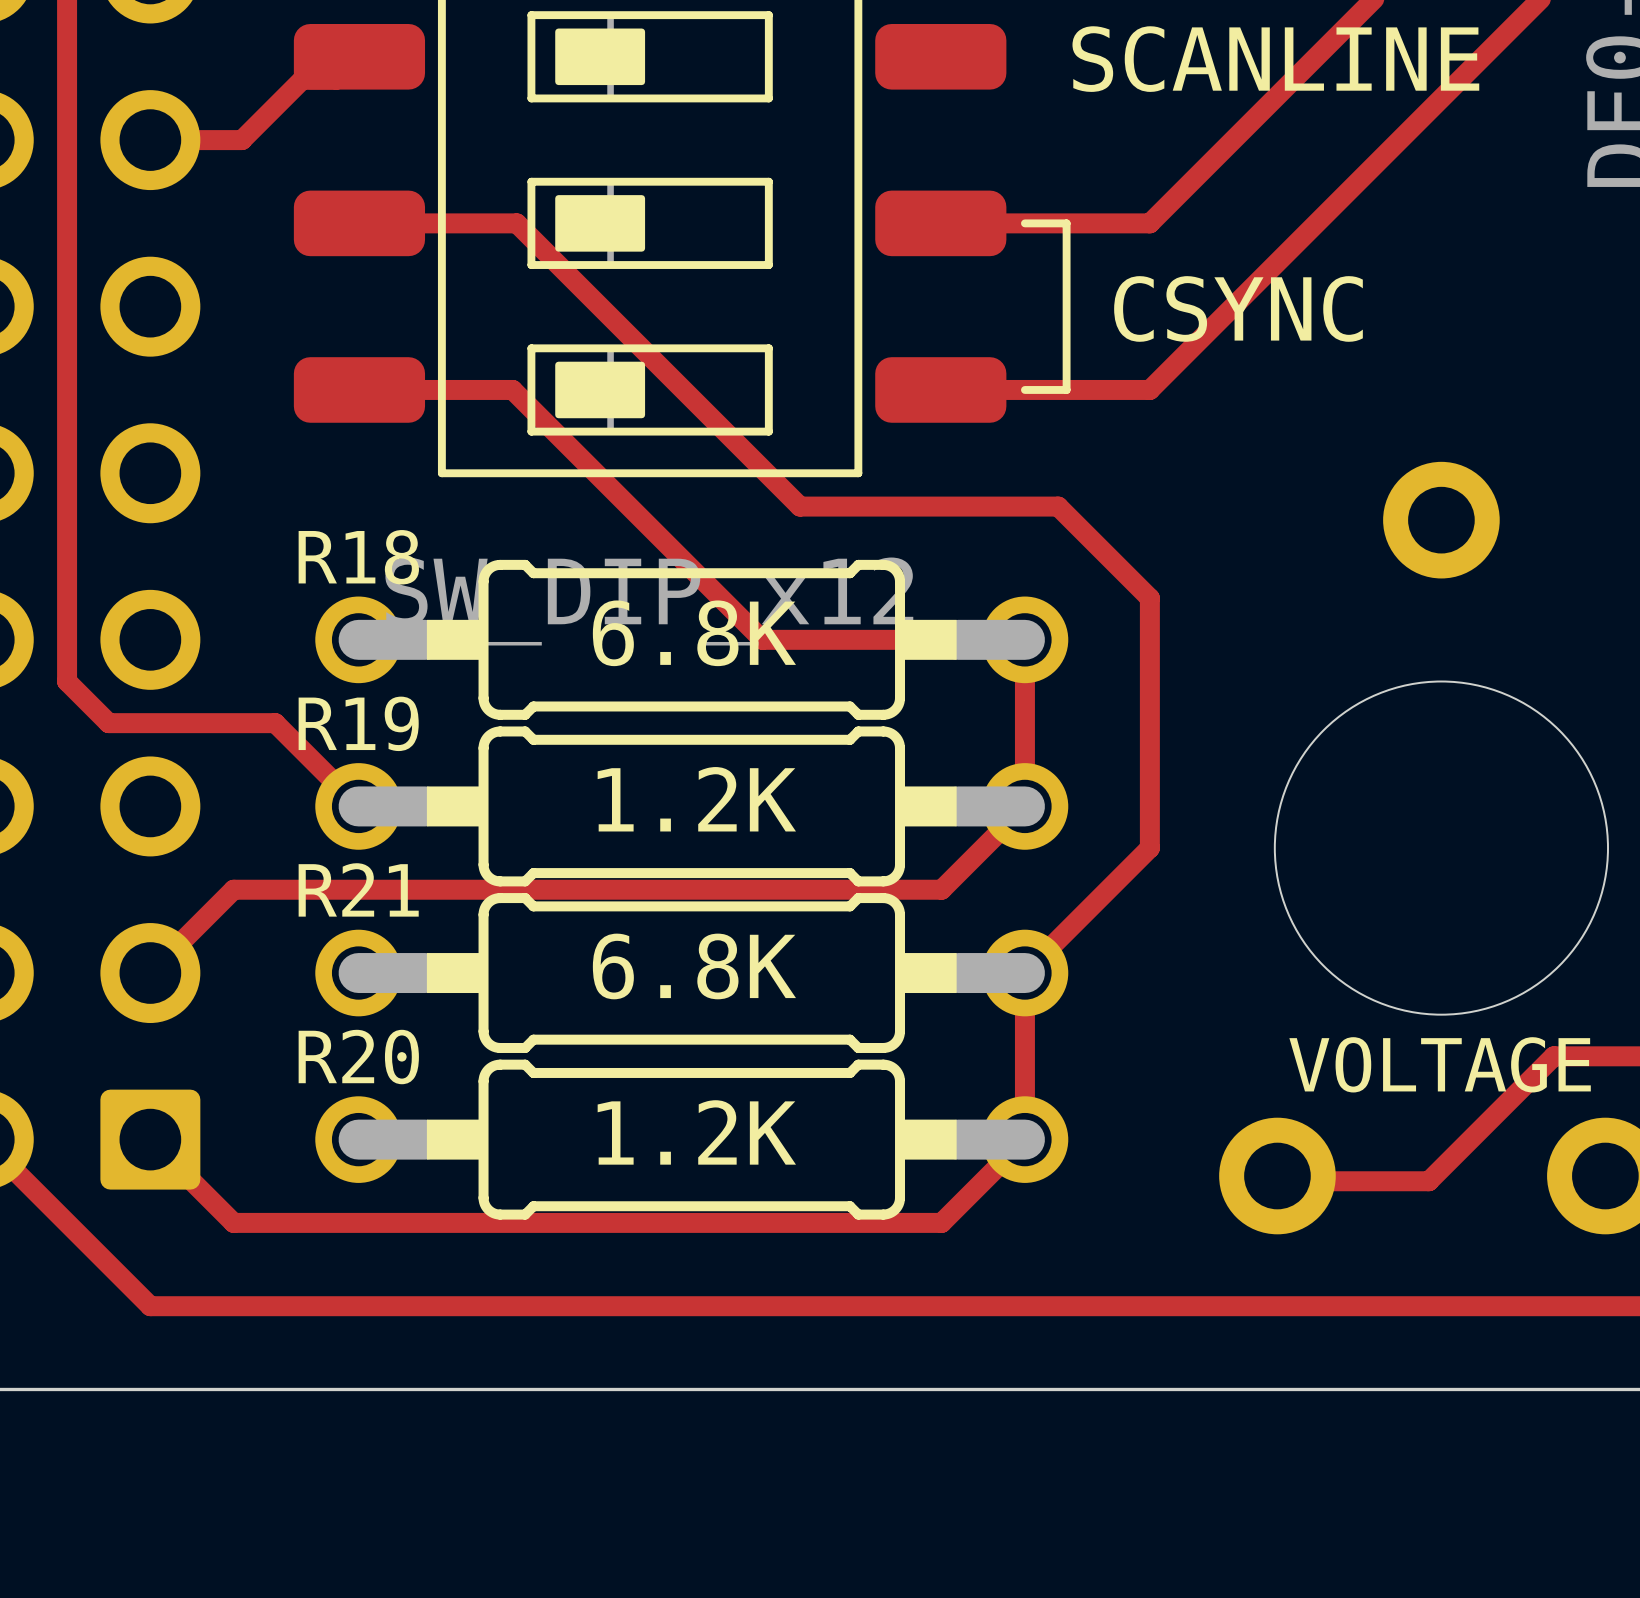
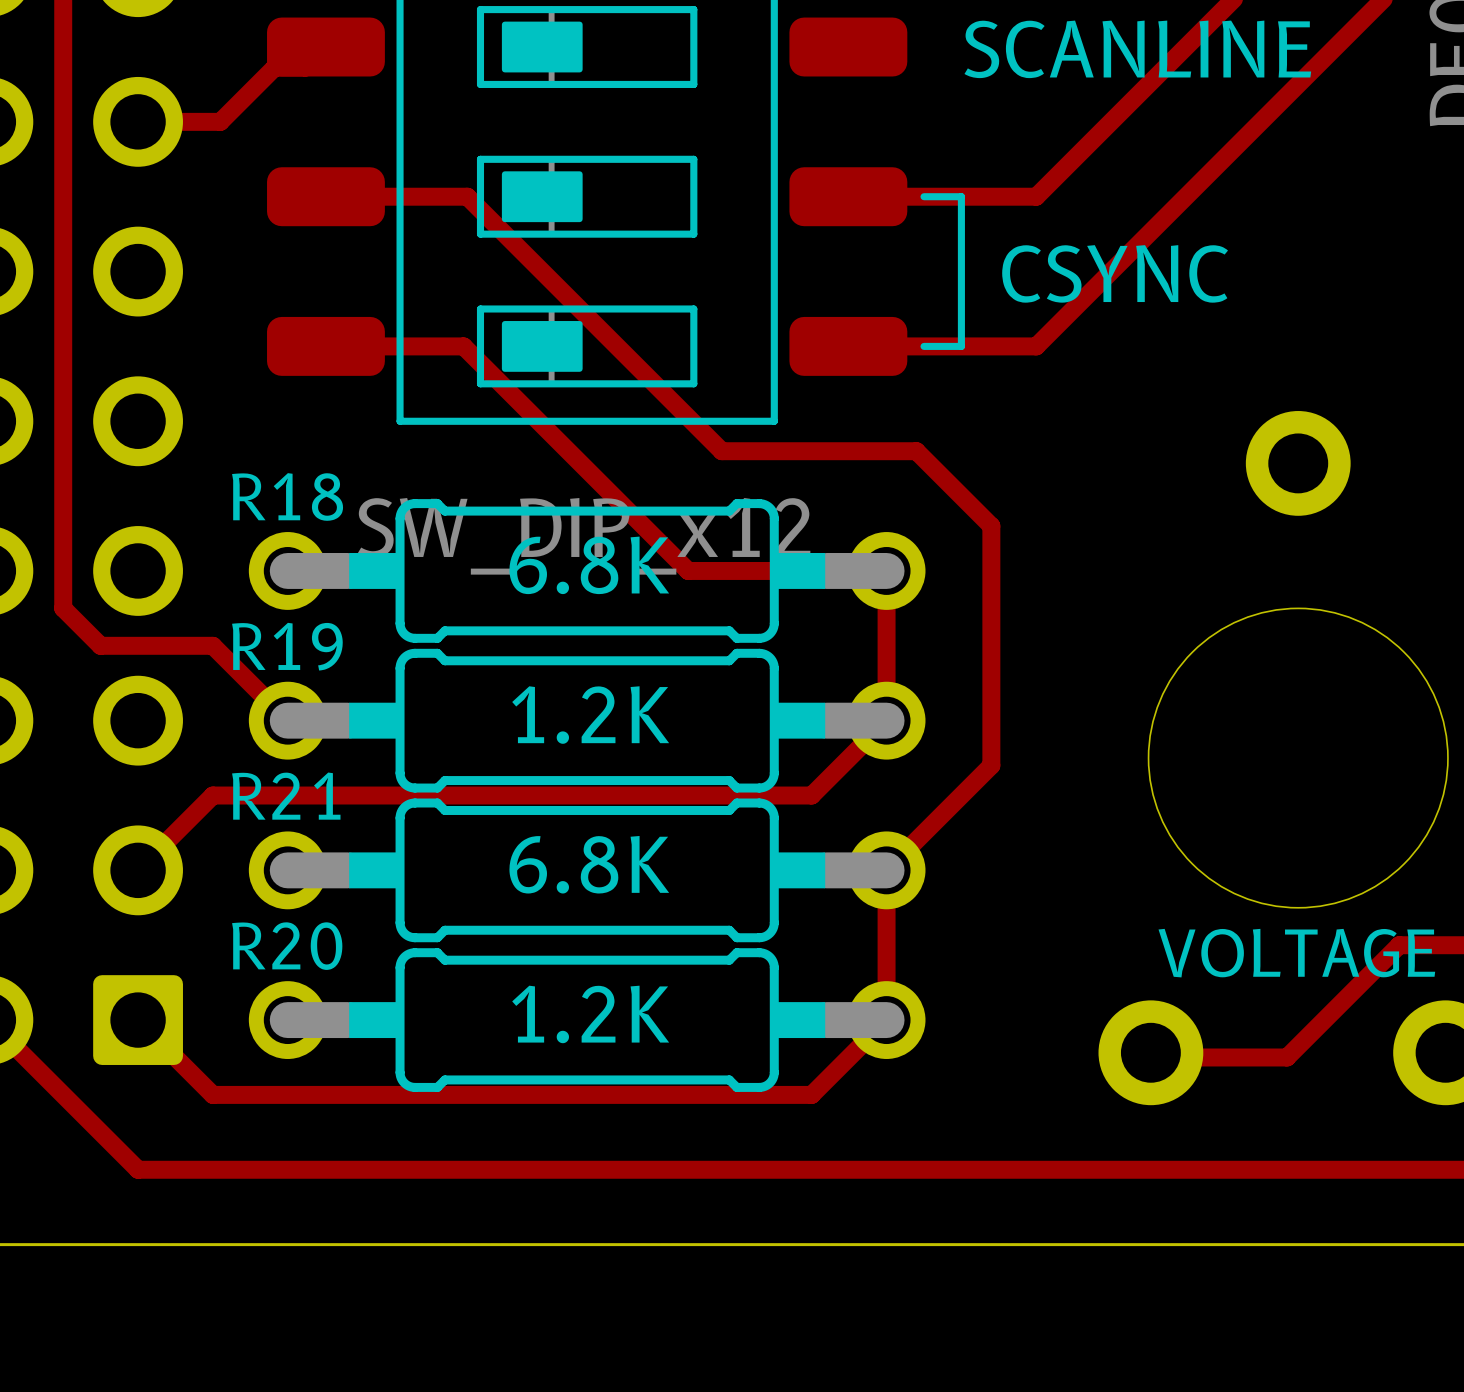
track: (1016, 506) (1058, 506) (1149, 598) (1149, 848) (1024, 973) (1024, 1139) (941, 1222) (900, 1222) -> (916, 451) (991, 526) (991, 765) (886, 870) (886, 1020) (811, 1094)
R18 position: (691, 639) -> (587, 570)
track: (983, 639) (1024, 639) (1024, 806) (941, 889) (900, 889) -> (886, 570) (886, 720) (811, 795)
track: (233, 723) (275, 723) (358, 806) -> (212, 645) (287, 720)
R19 position: (691, 806) -> (587, 720)
R21 position: (691, 973) -> (587, 870)
R20 position: (691, 1139) -> (587, 1020)

